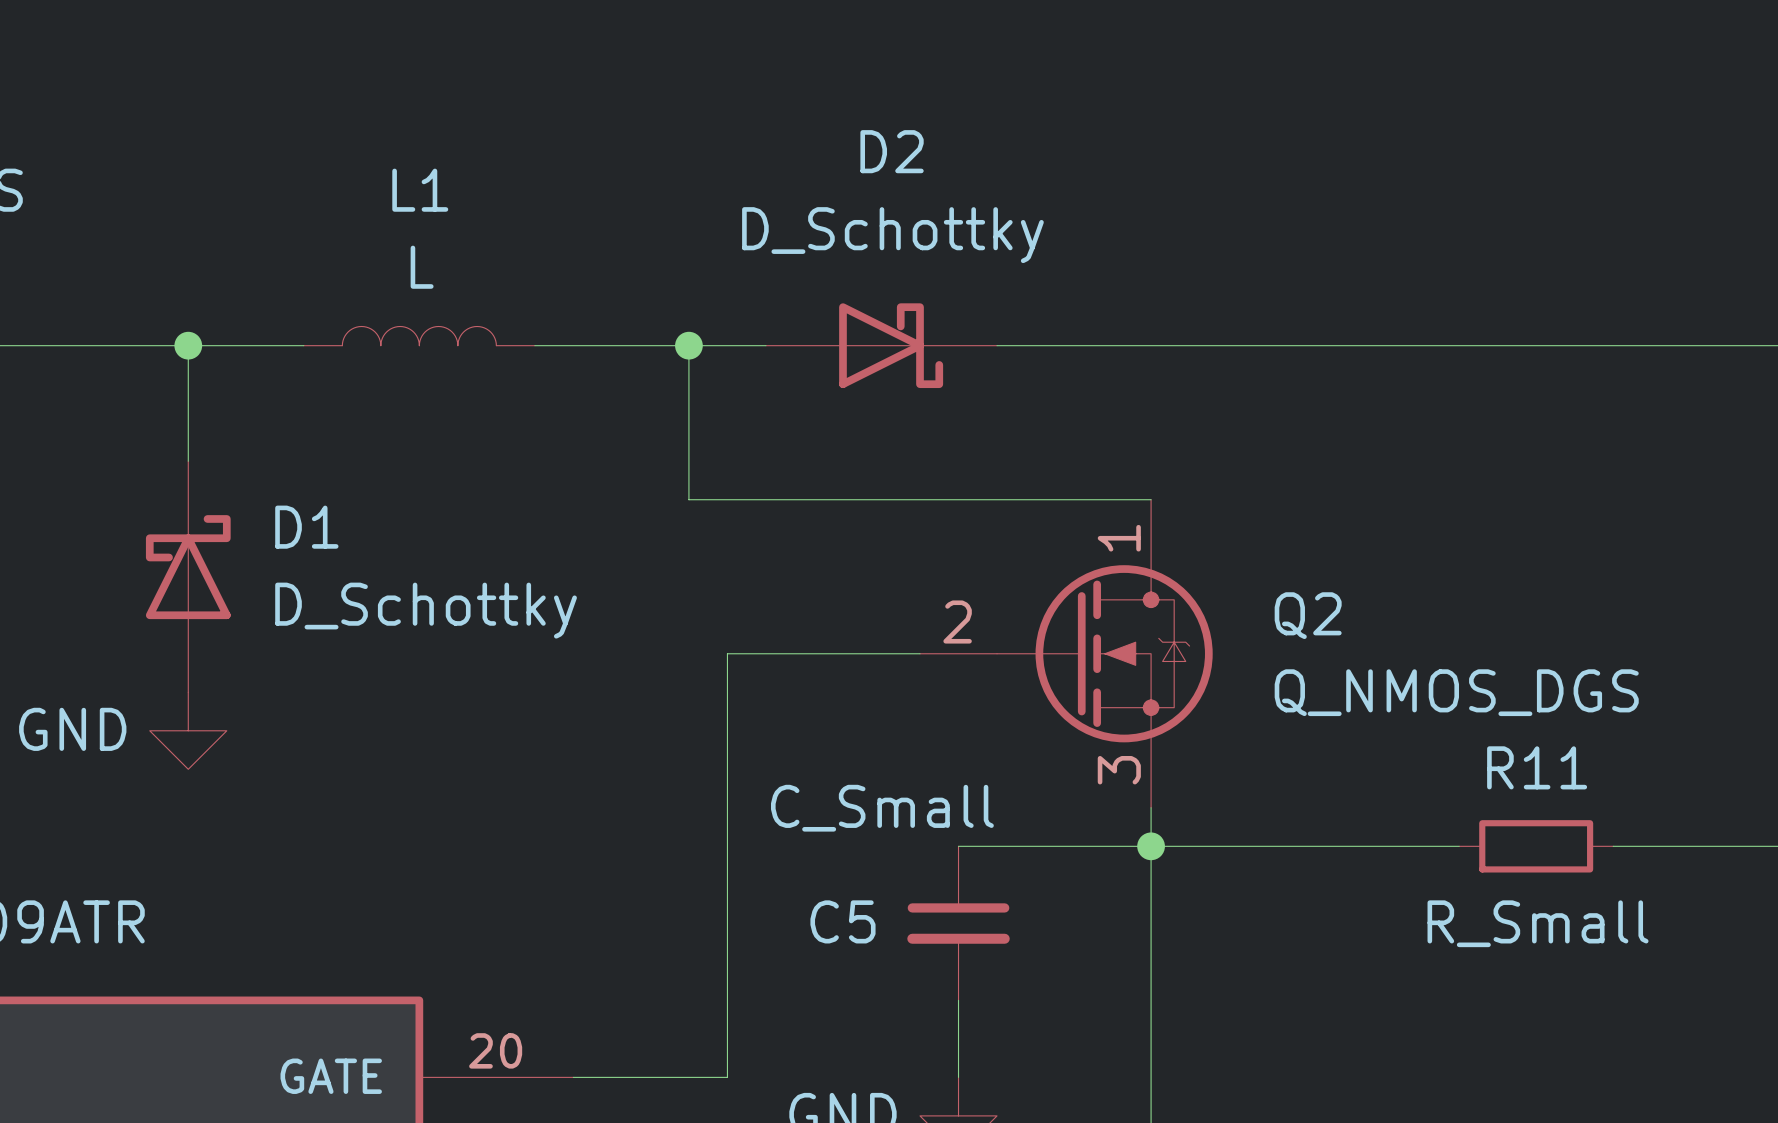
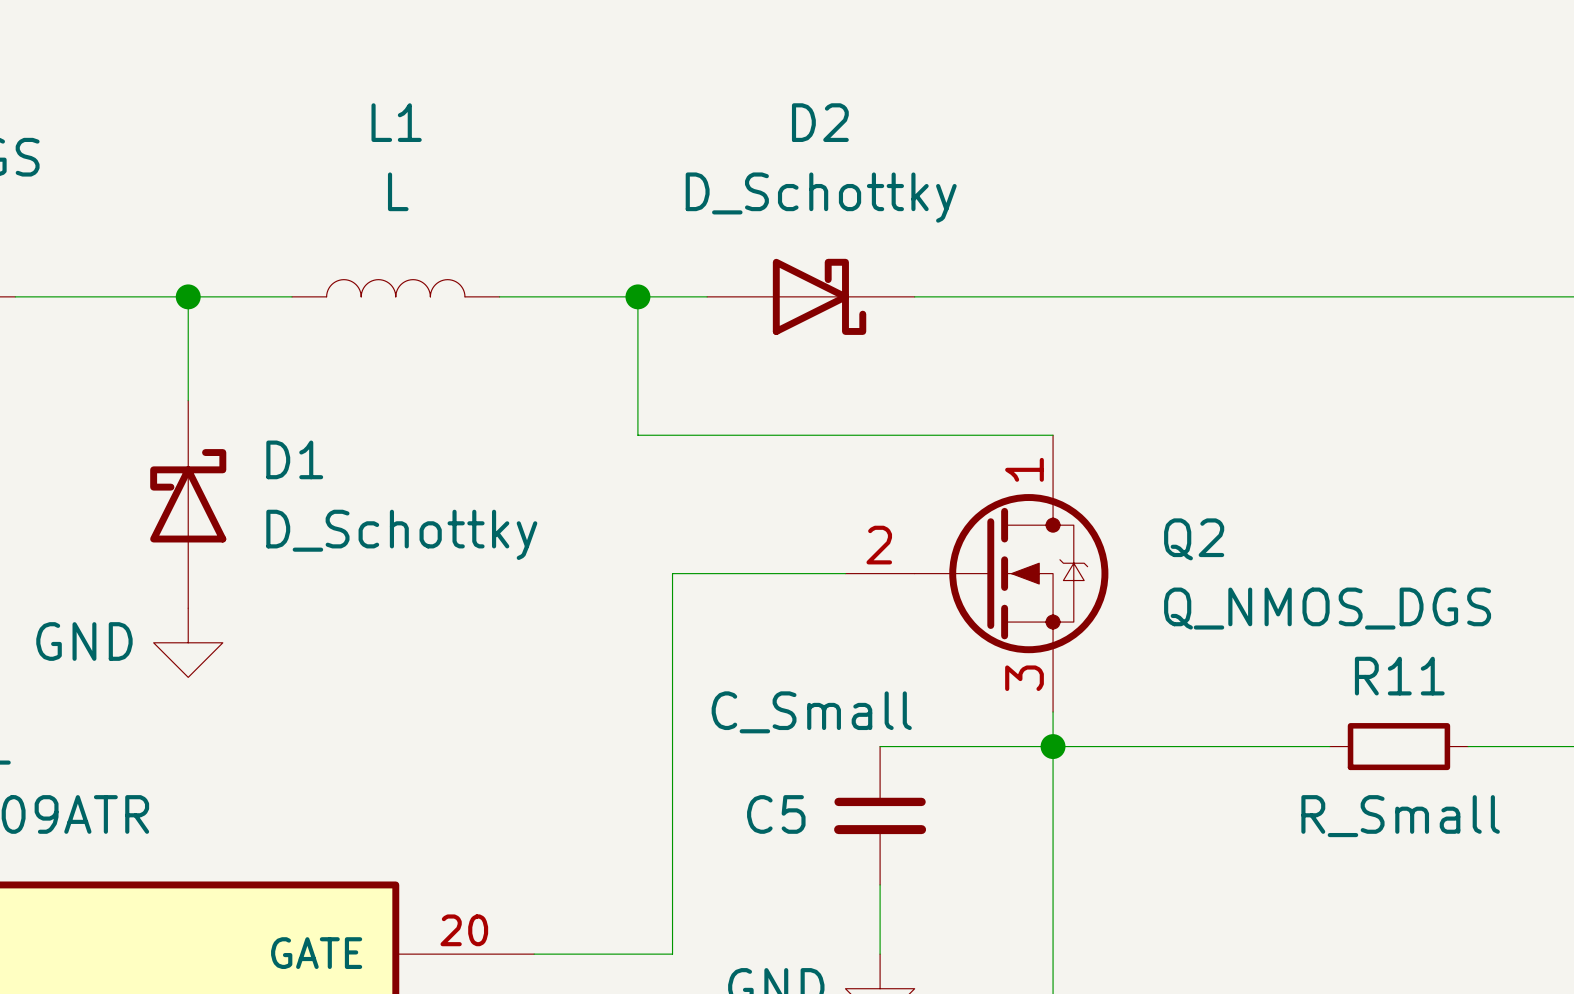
L1 name position: L1 (420, 190) -> L1 (396, 122)
L1 value position: L (422, 267) -> L (398, 191)

